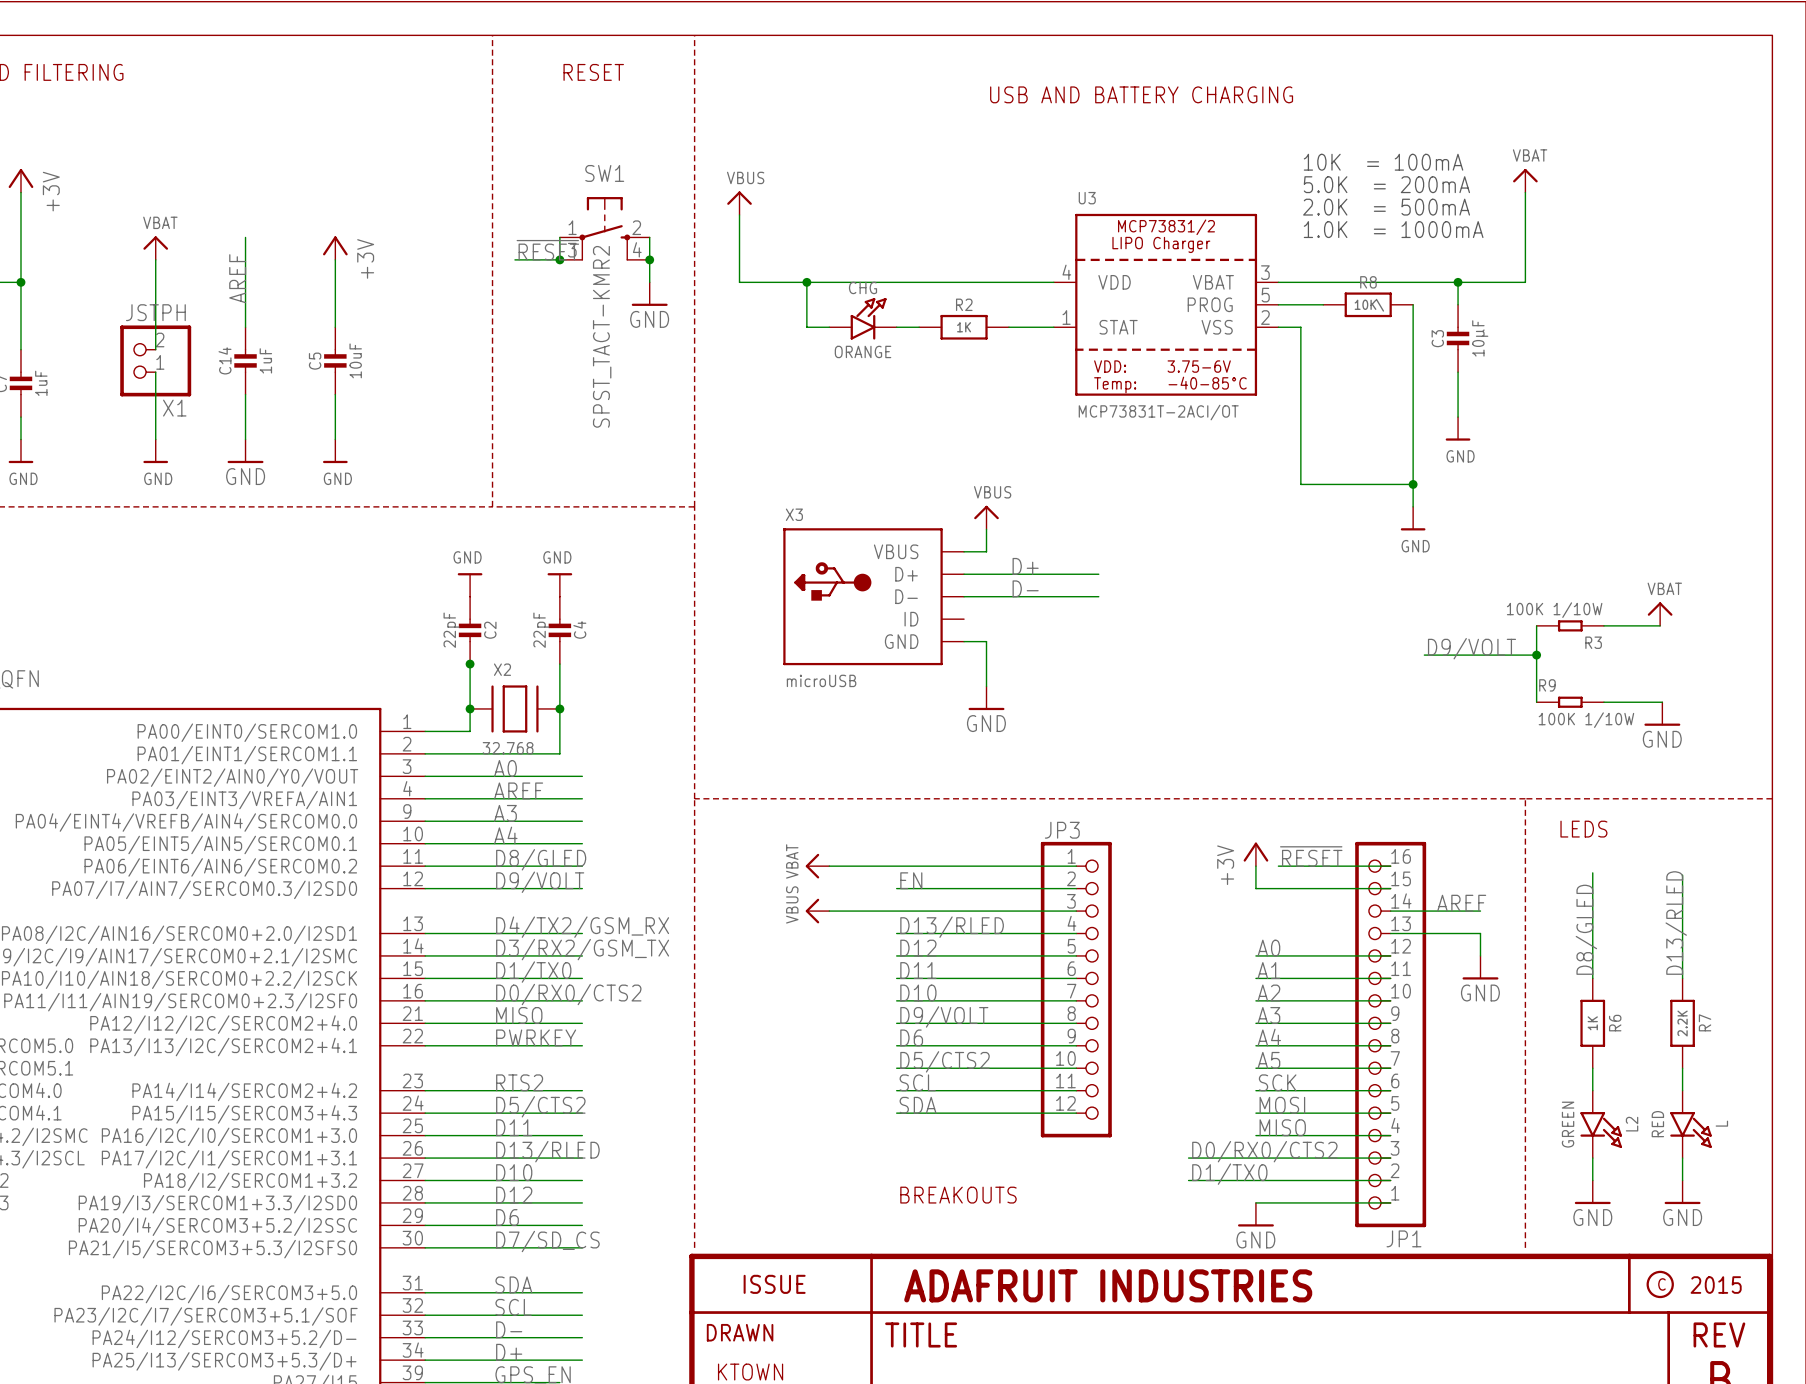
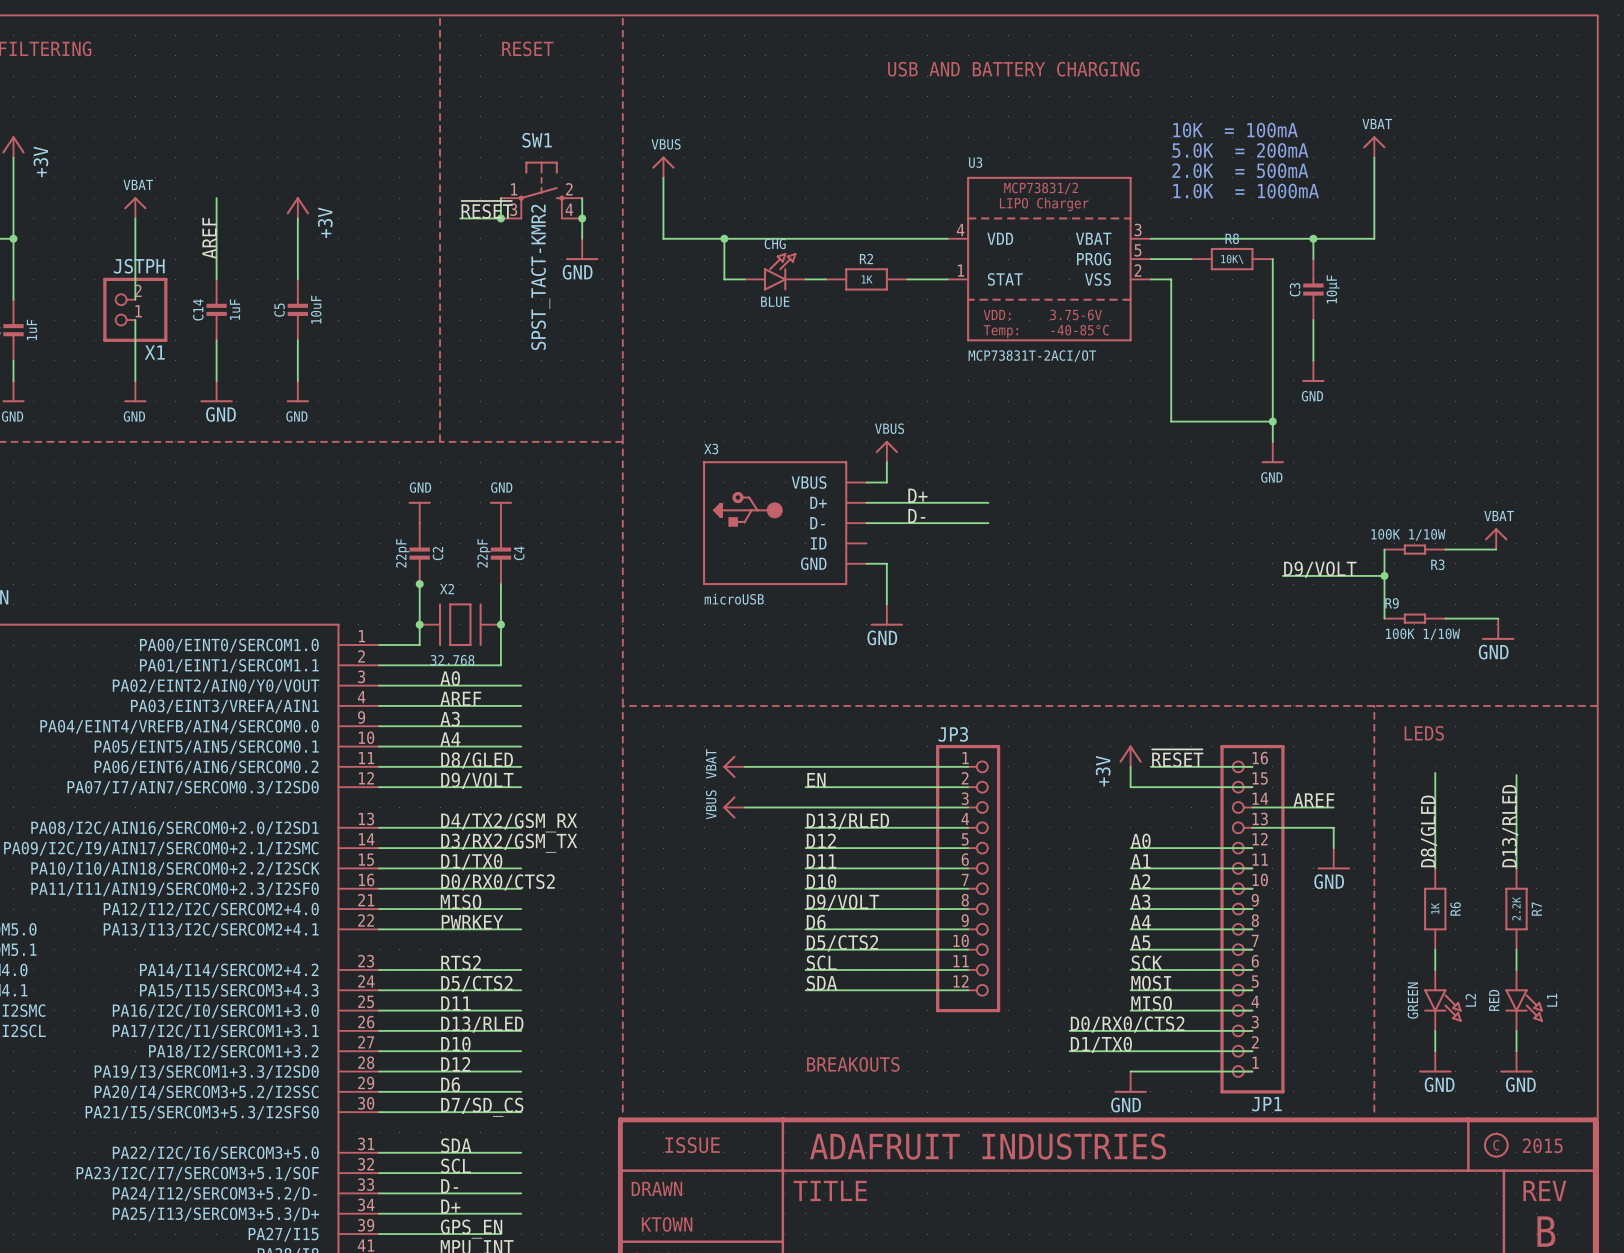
CHG value: ORANGE (863, 351) -> BLUE (775, 301)
L name: L (1721, 1123) -> L1 (1552, 1000)

